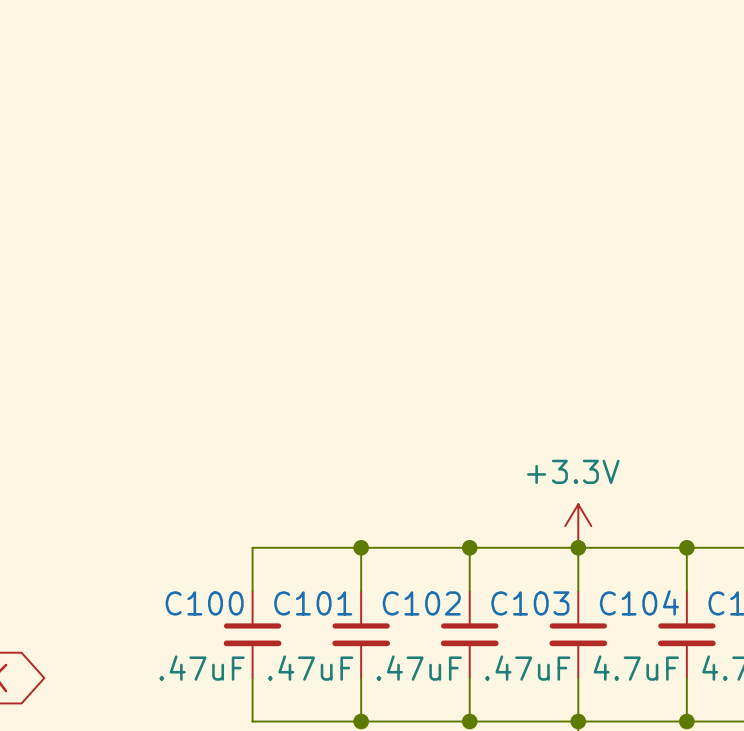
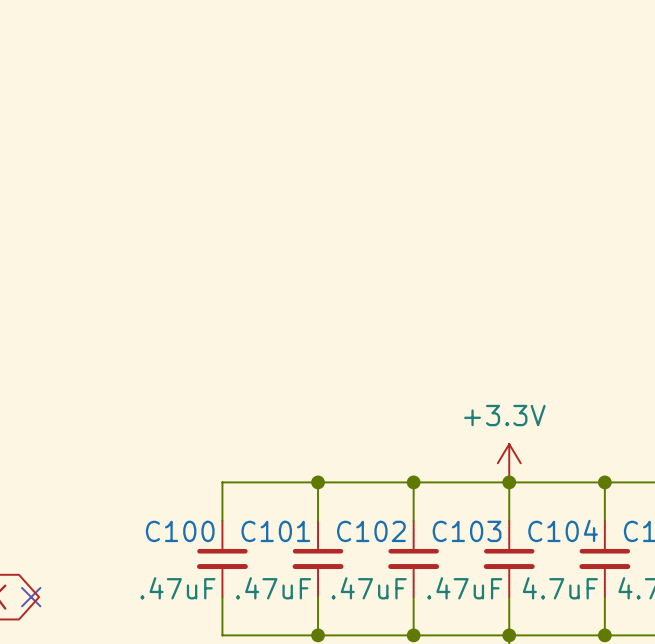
no-connect mark: none -> (31, 597)

